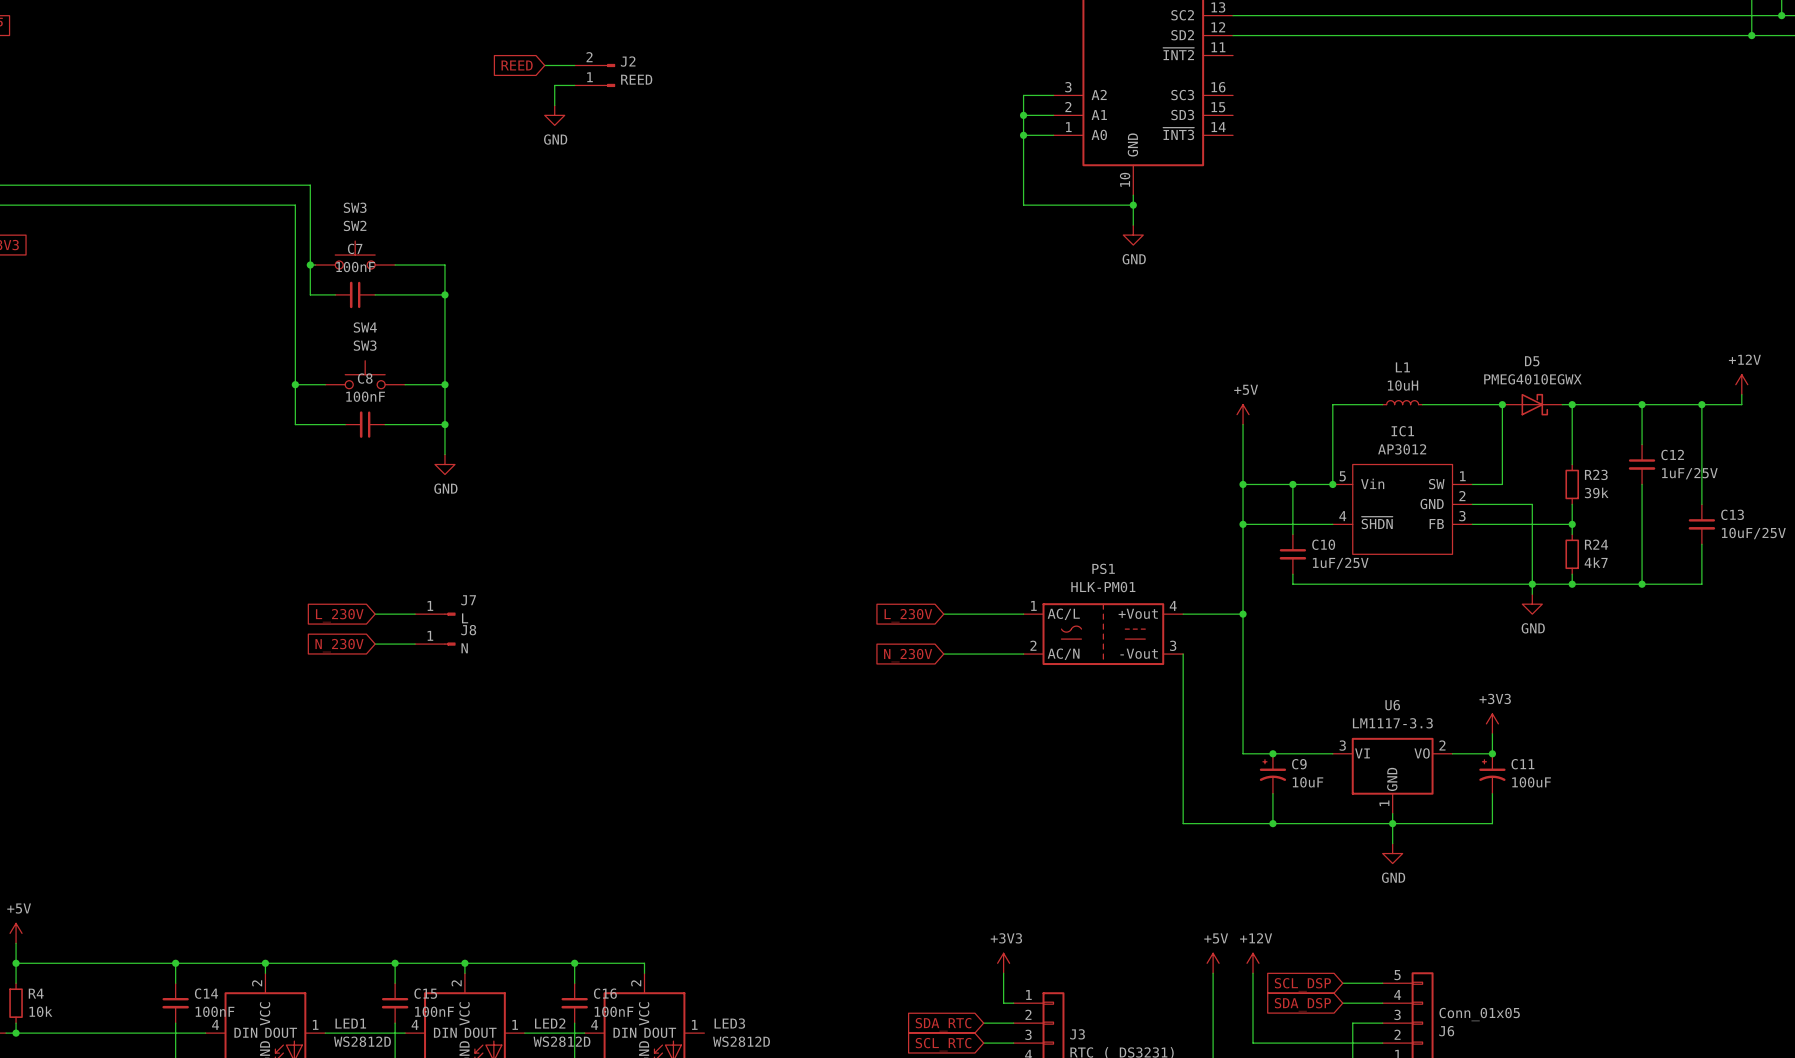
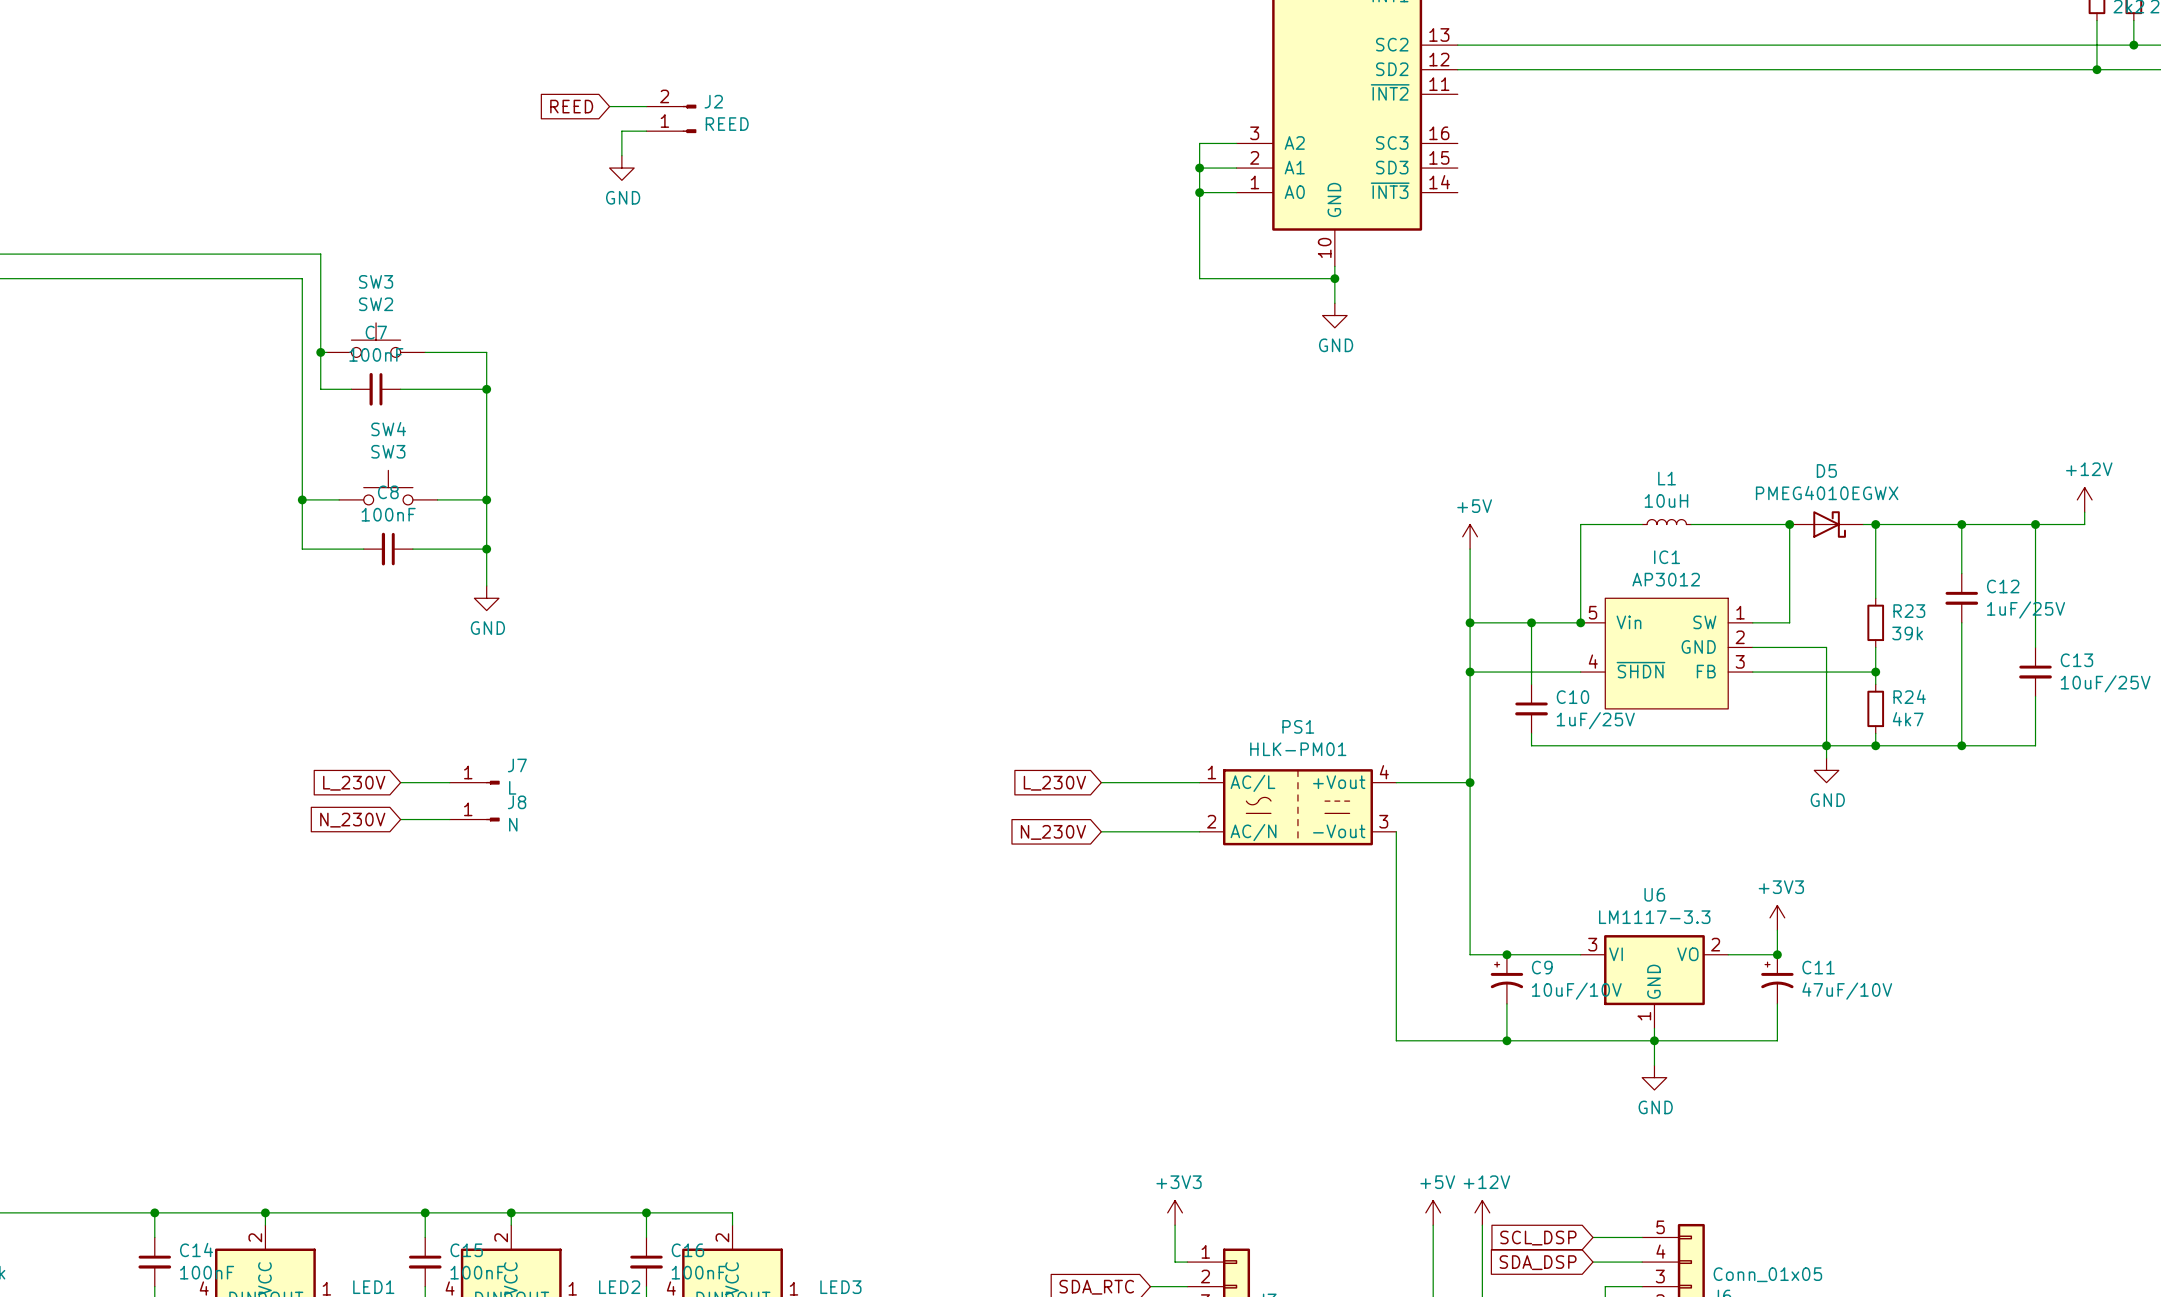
C9 value: 10uF (1308, 782) -> 10uF/10V (1576, 991)
C11 value: 100uF (1531, 782) -> 47uF/10V (1847, 991)

